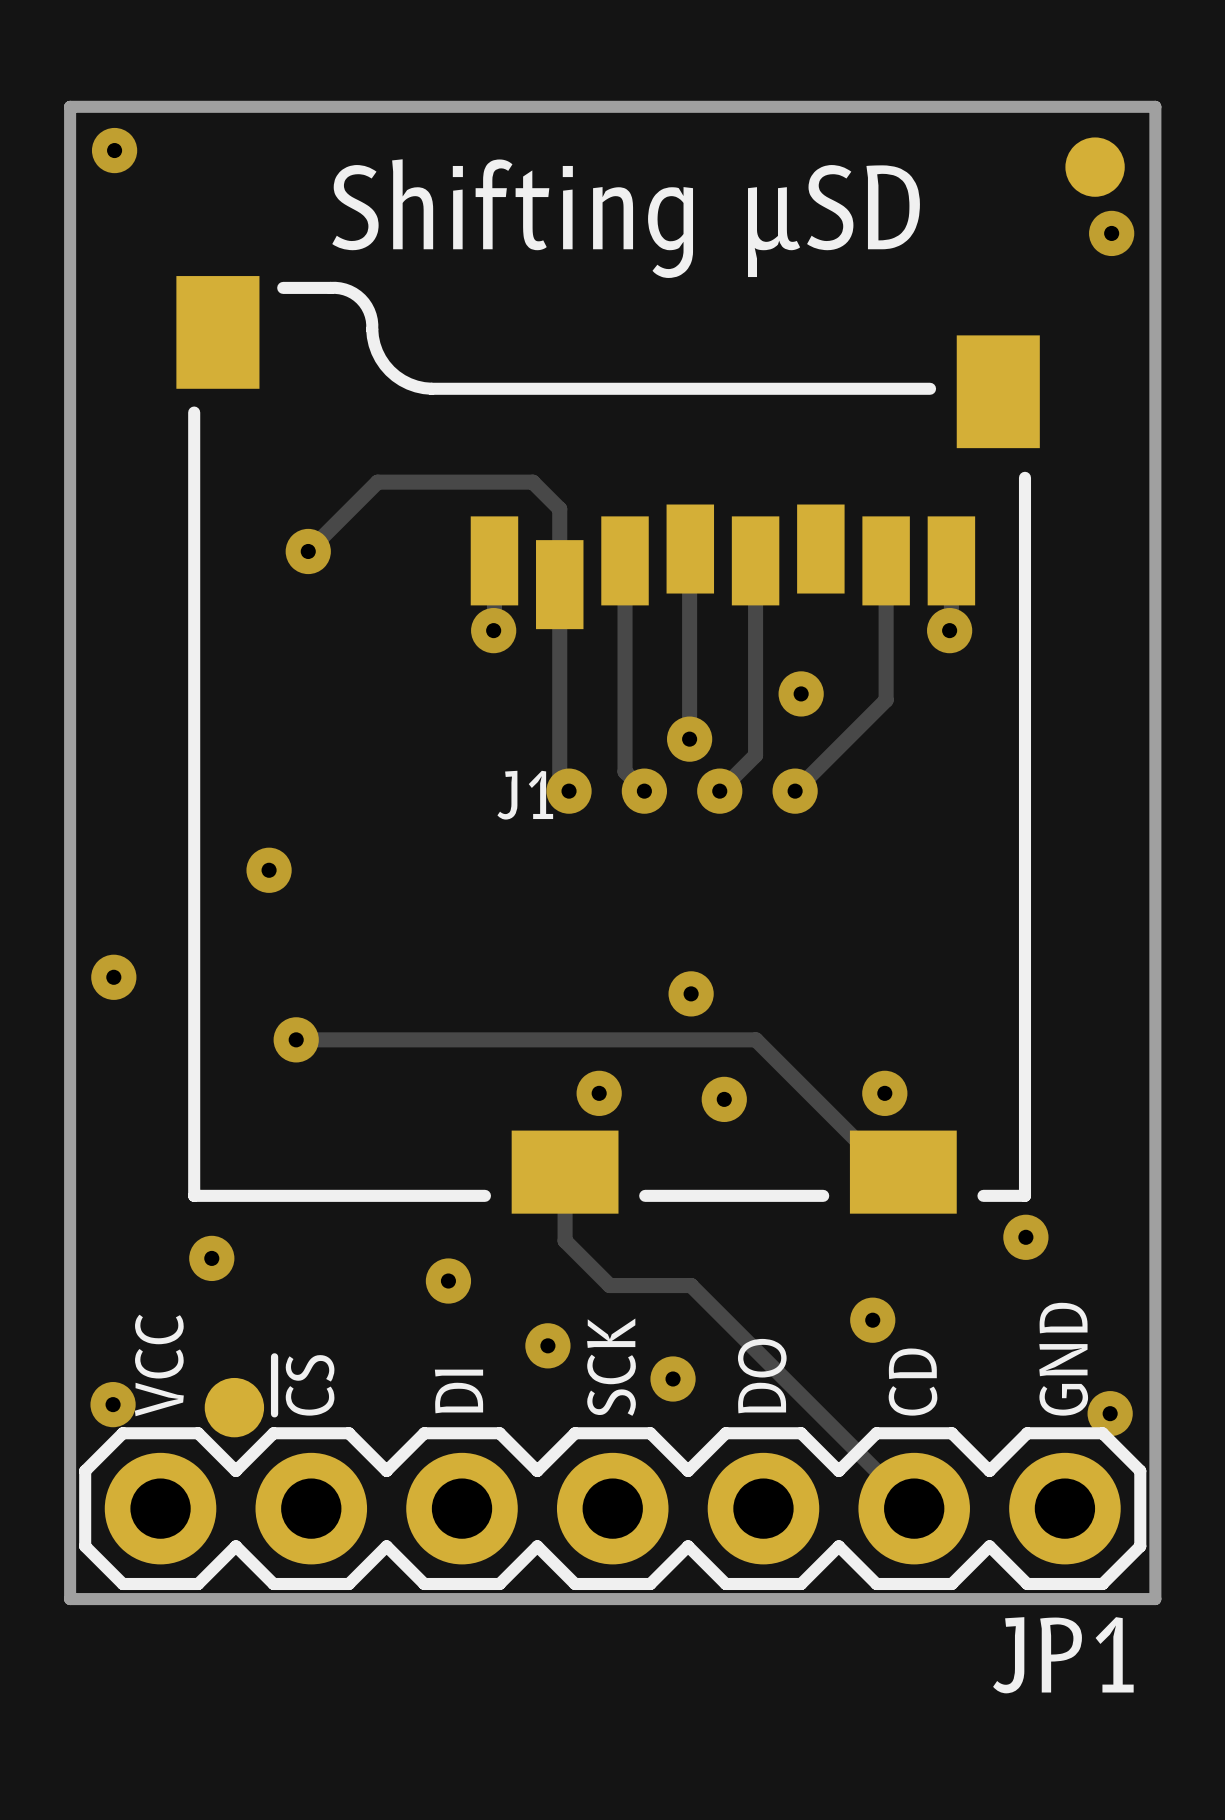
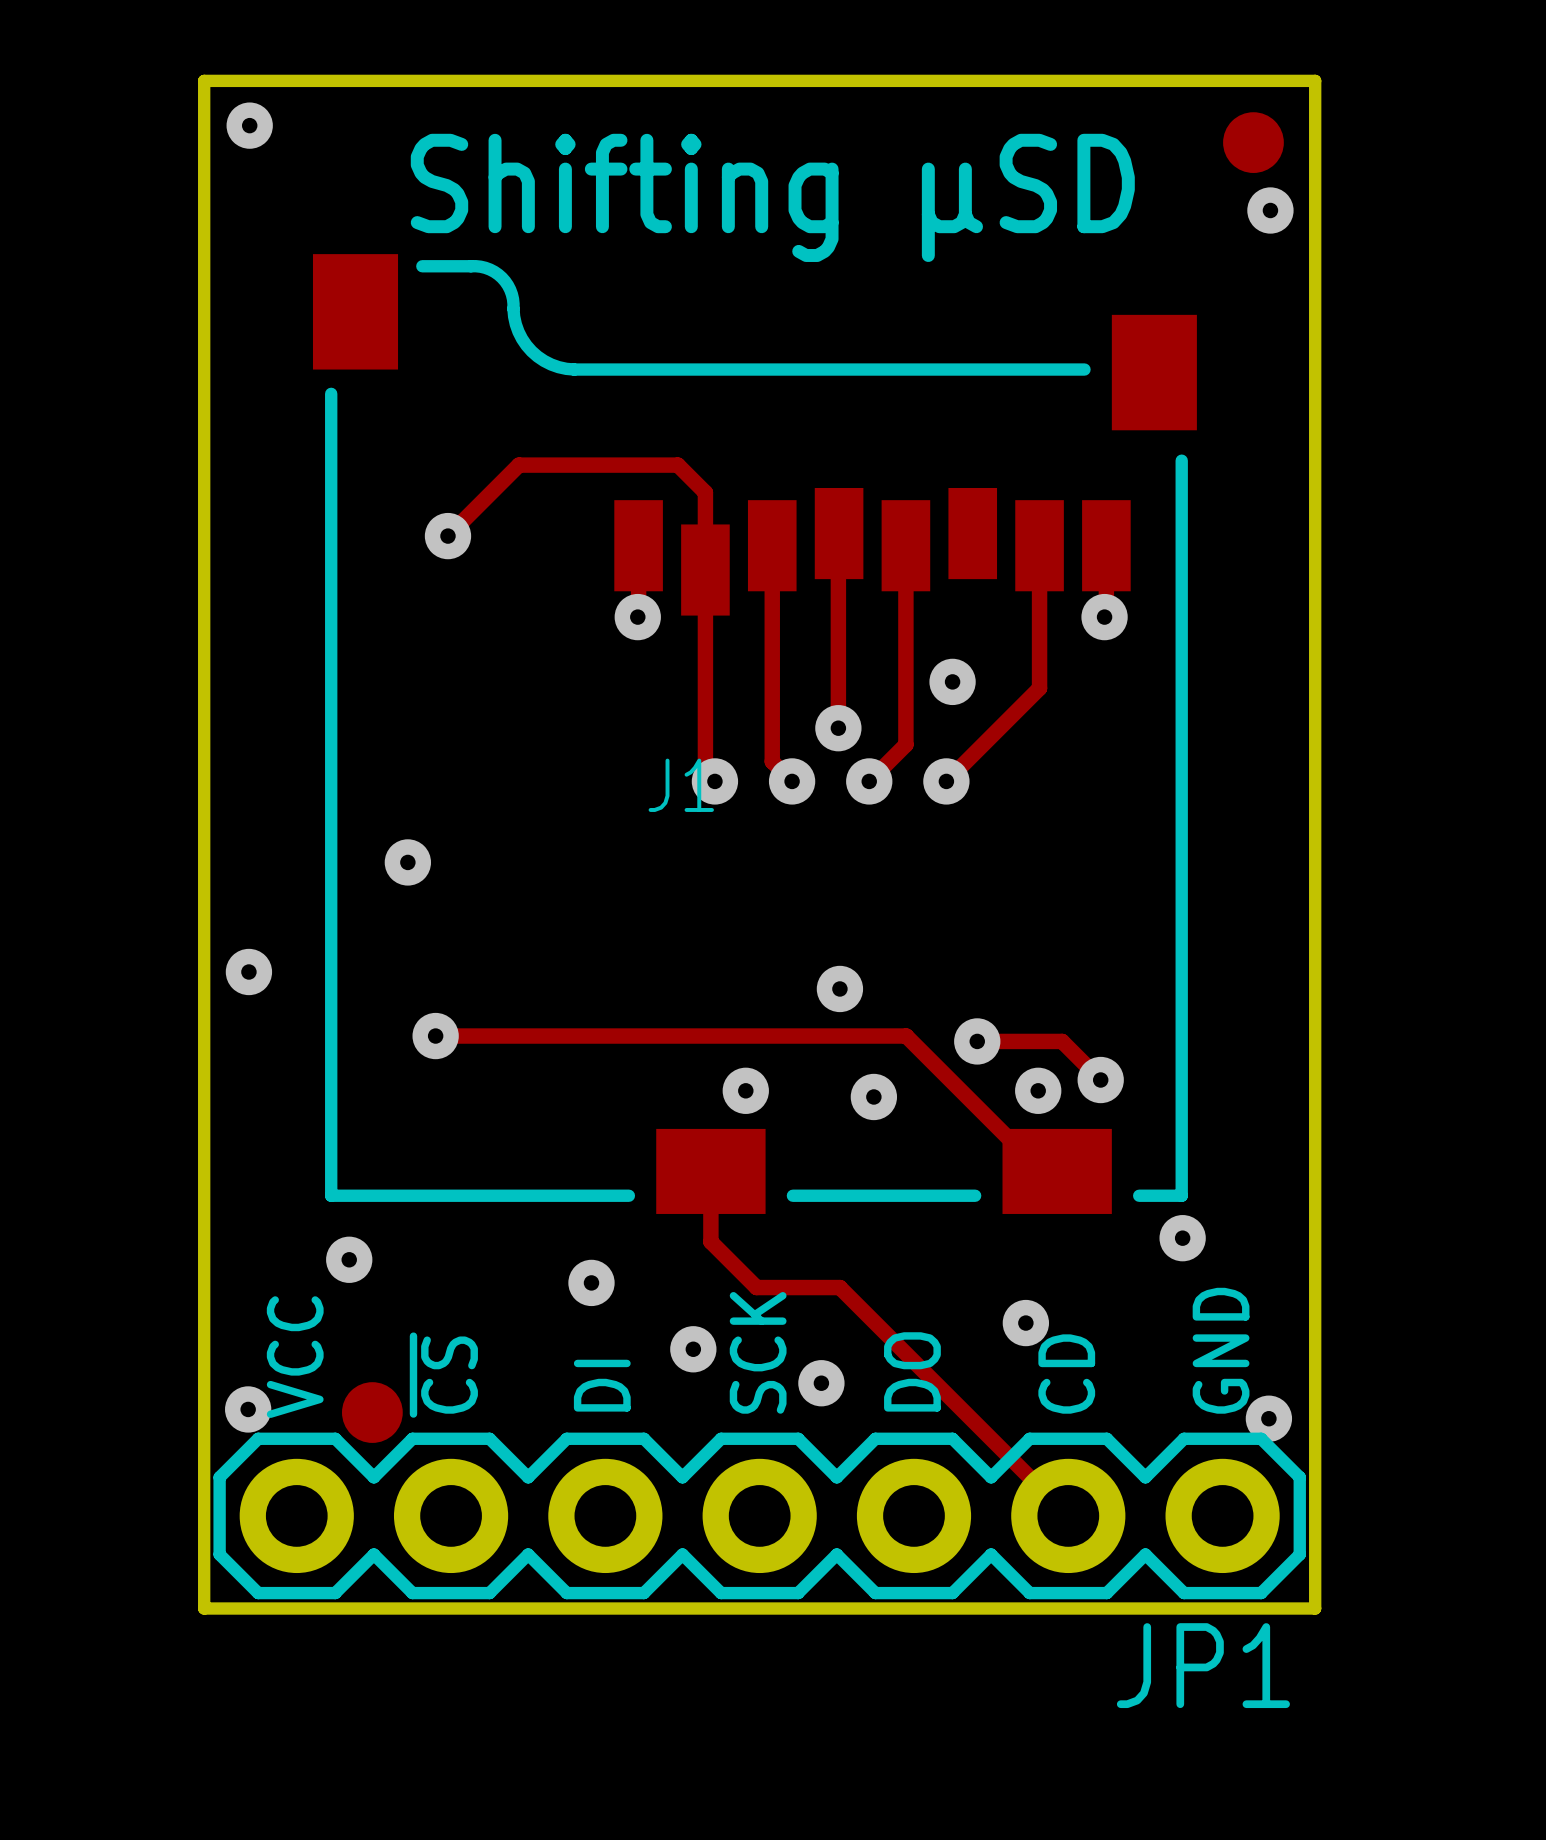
track: none -> (977, 1041) (1062, 1041) (1100, 1080)
via: none -> (977, 1041)
via: none -> (1100, 1080)

